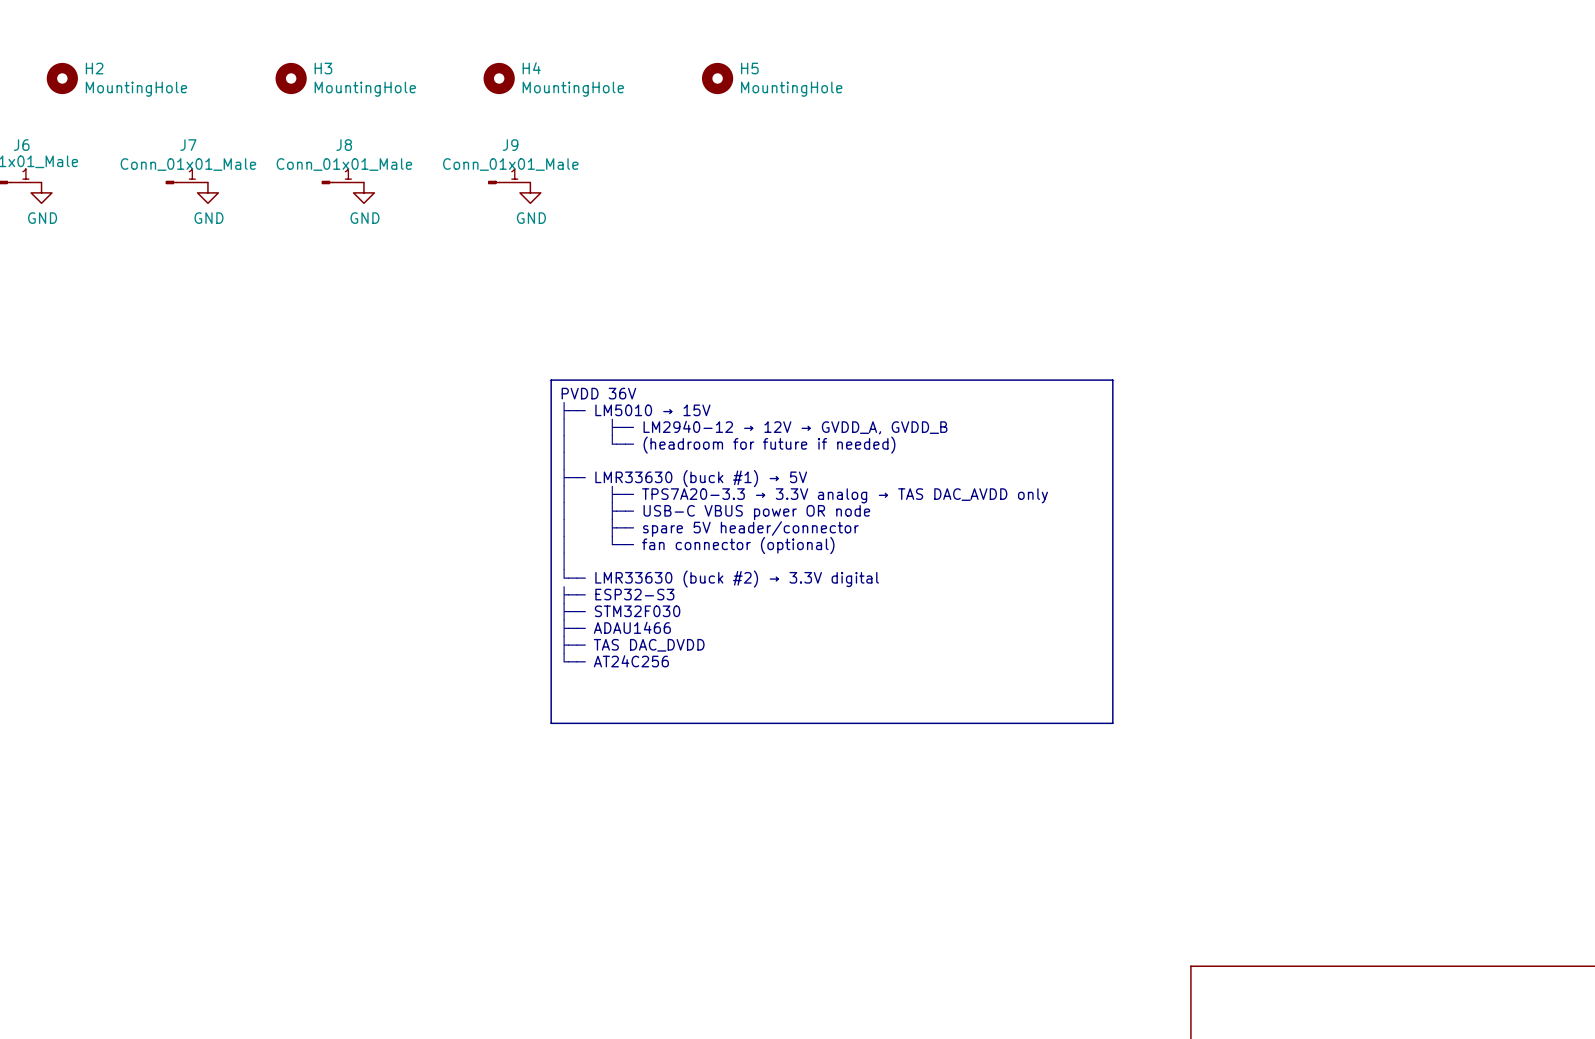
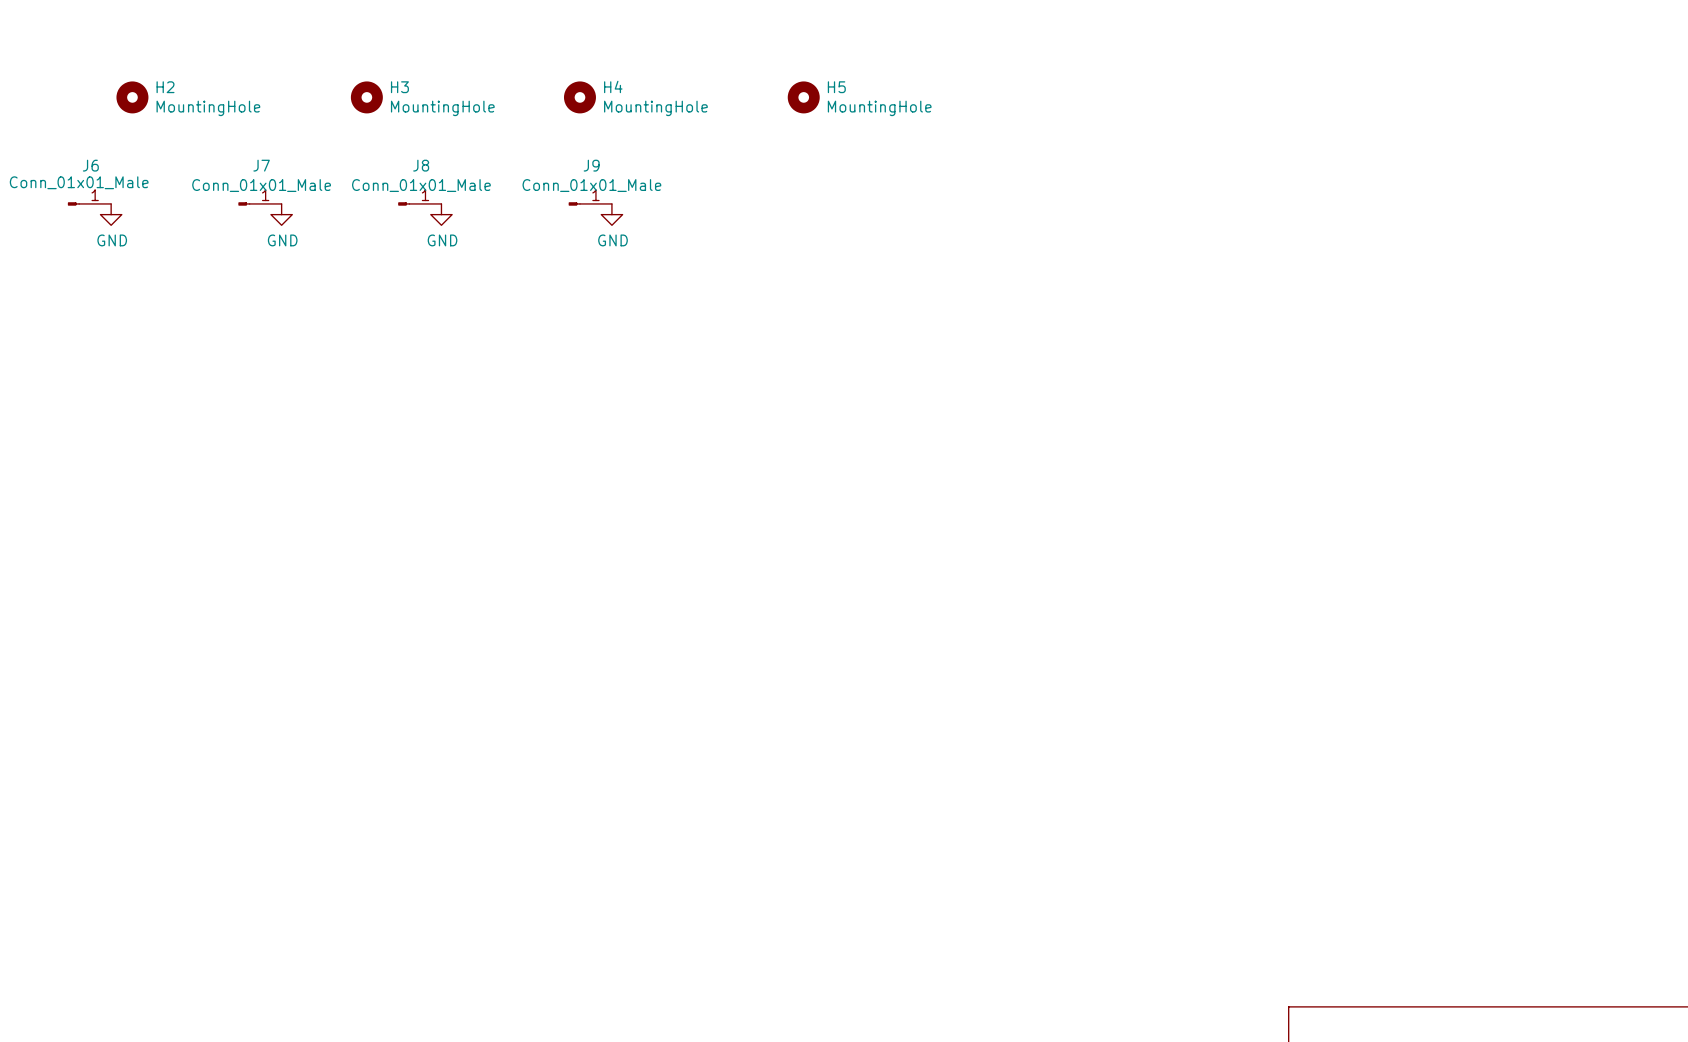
line: (551, 380) (1112, 380) (1112, 723) (551, 723) (551, 380) -> none
text: PVDD 36V (598, 393) -> none
text: ├── LM5010 → 15V (636, 410) -> none
text: │ ├── LM2940-12 → 12V → GVDD_A, GVDD_B (755, 427) -> none
text: │ └── (headroom for future if needed) (729, 444) -> none
text: │ (564, 460) -> none
text: ├── LMR33630 (buck #1) → 5V (684, 477) -> none
text: │ ├── TPS7A20-3.3 → 3.3V analog → TAS DAC_AVDD only (805, 494) -> none
text: │ ├── USB-C VBUS power OR node (716, 511) -> none
text: │ ├── spare 5V header/connector (710, 527) -> none
text: │ └── fan connector (optional) (698, 544) -> none
text: │ (564, 561) -> none
text: └── LMR33630 (buck #2) → 3.3V digital (720, 578) -> none
text: ├── ESP32-S3 (618, 594) -> none
text: ├── STM32F030 (621, 611) -> none
text: ├── ADAU1466 (616, 628) -> none
text: ├── TAS DAC_DVDD (633, 645) -> none
text: └── AT24C256 (615, 660) -> none

